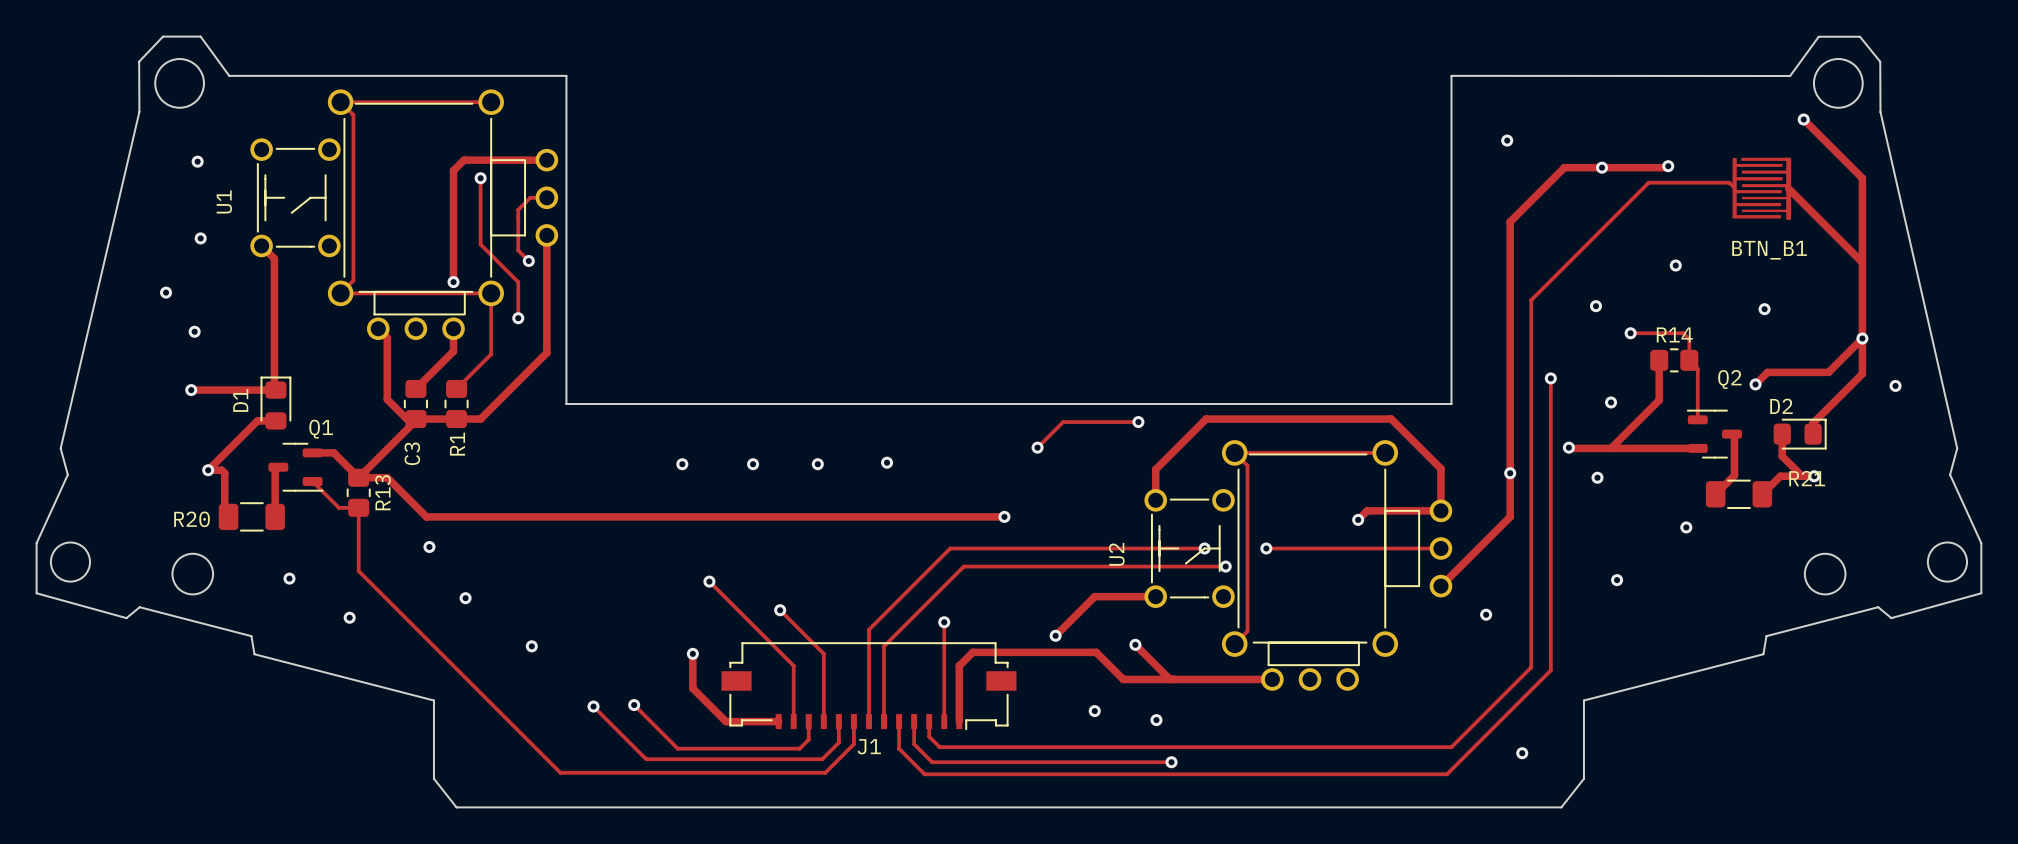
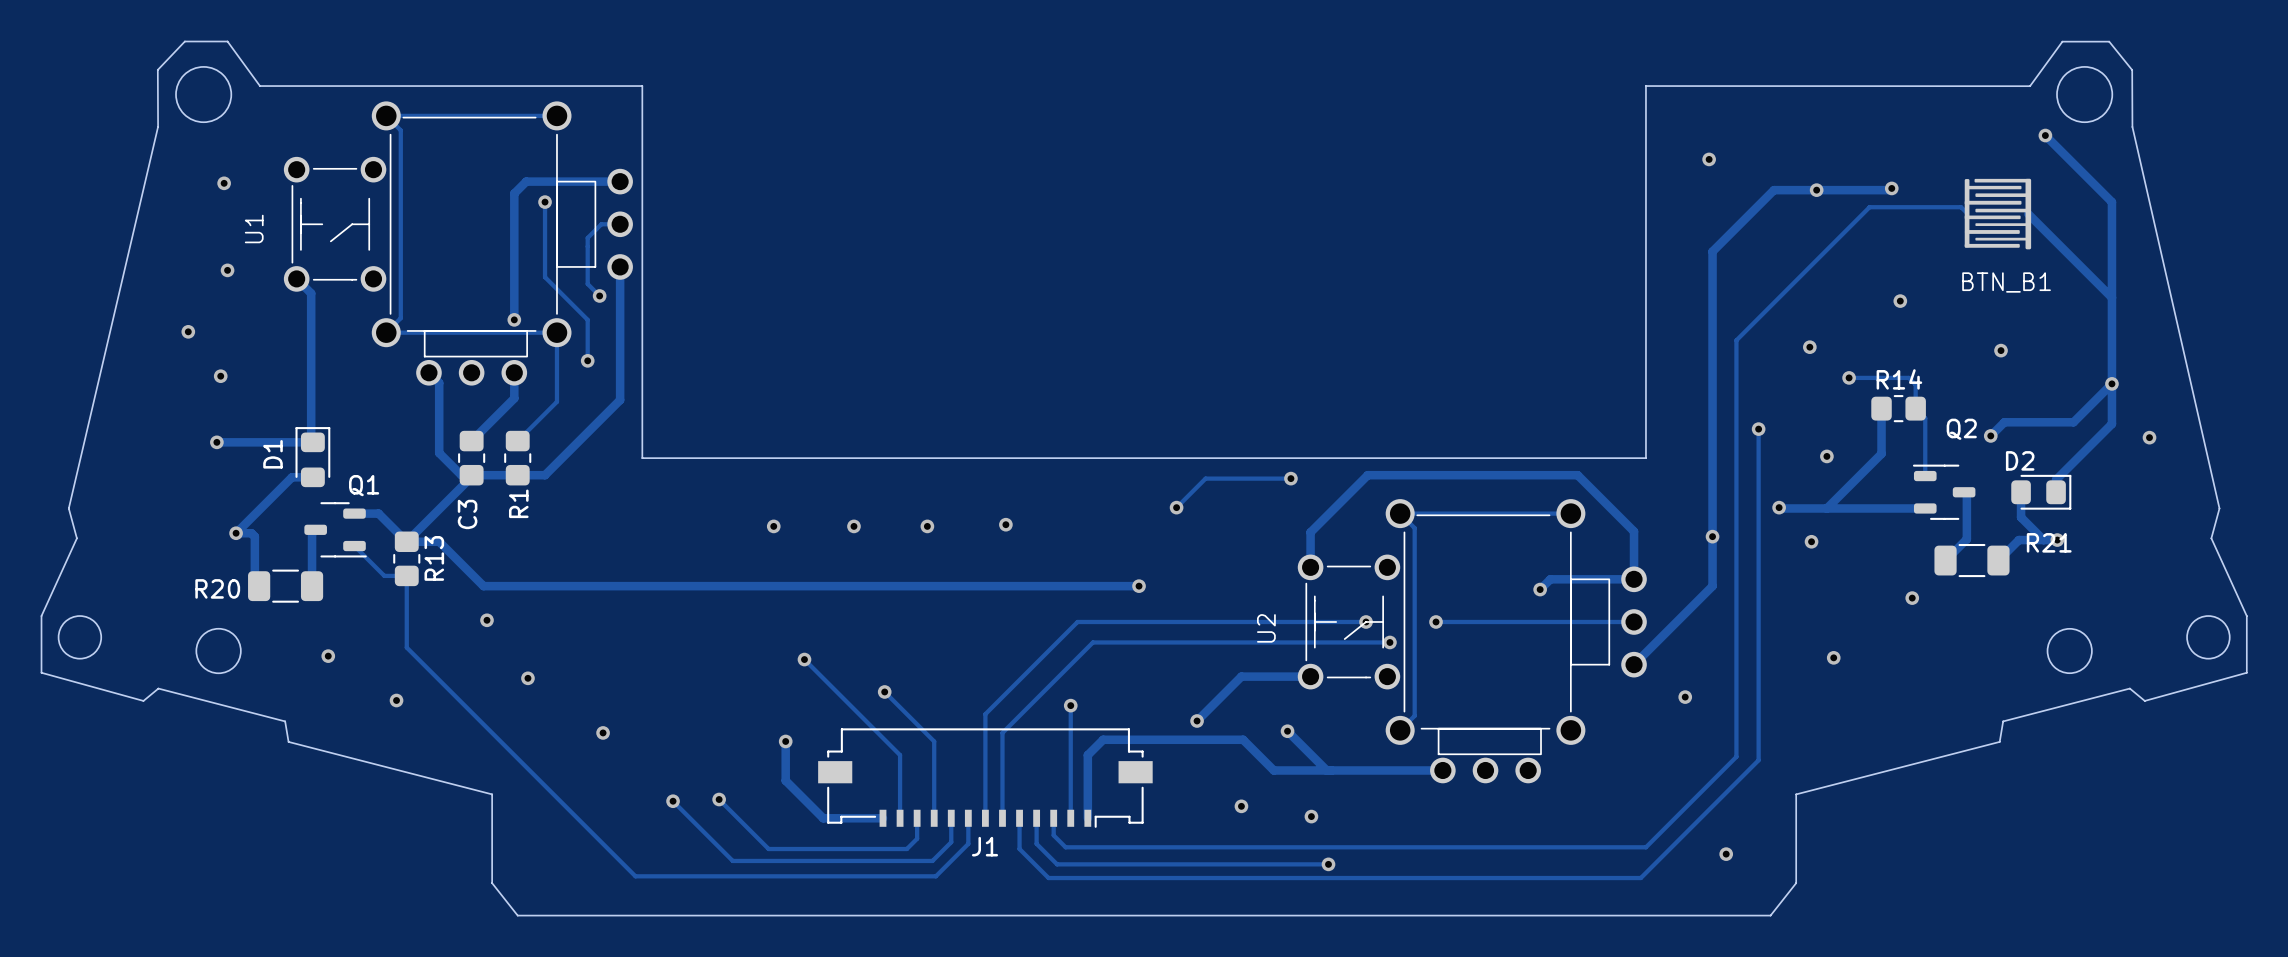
round board edge: none -> [57, 615, 103, 660]
round board edge: none -> [2186, 615, 2231, 660]
round board edge: [171, 553, 214, 596] -> none
round board edge: [1804, 553, 1847, 596] -> none
round board edge position: (70, 562) -> (218, 651)
round board edge position: (1947, 562) -> (2069, 651)

